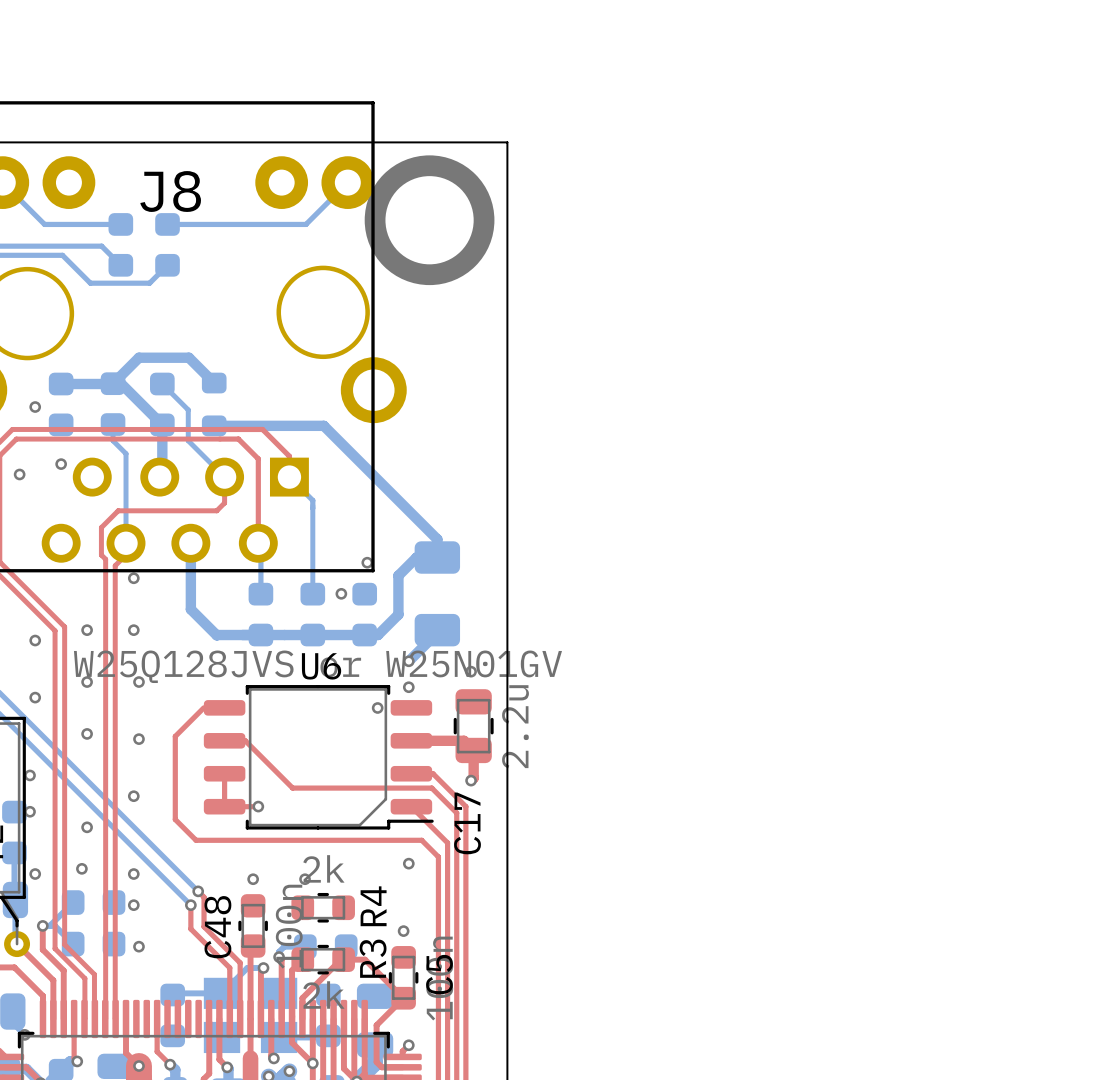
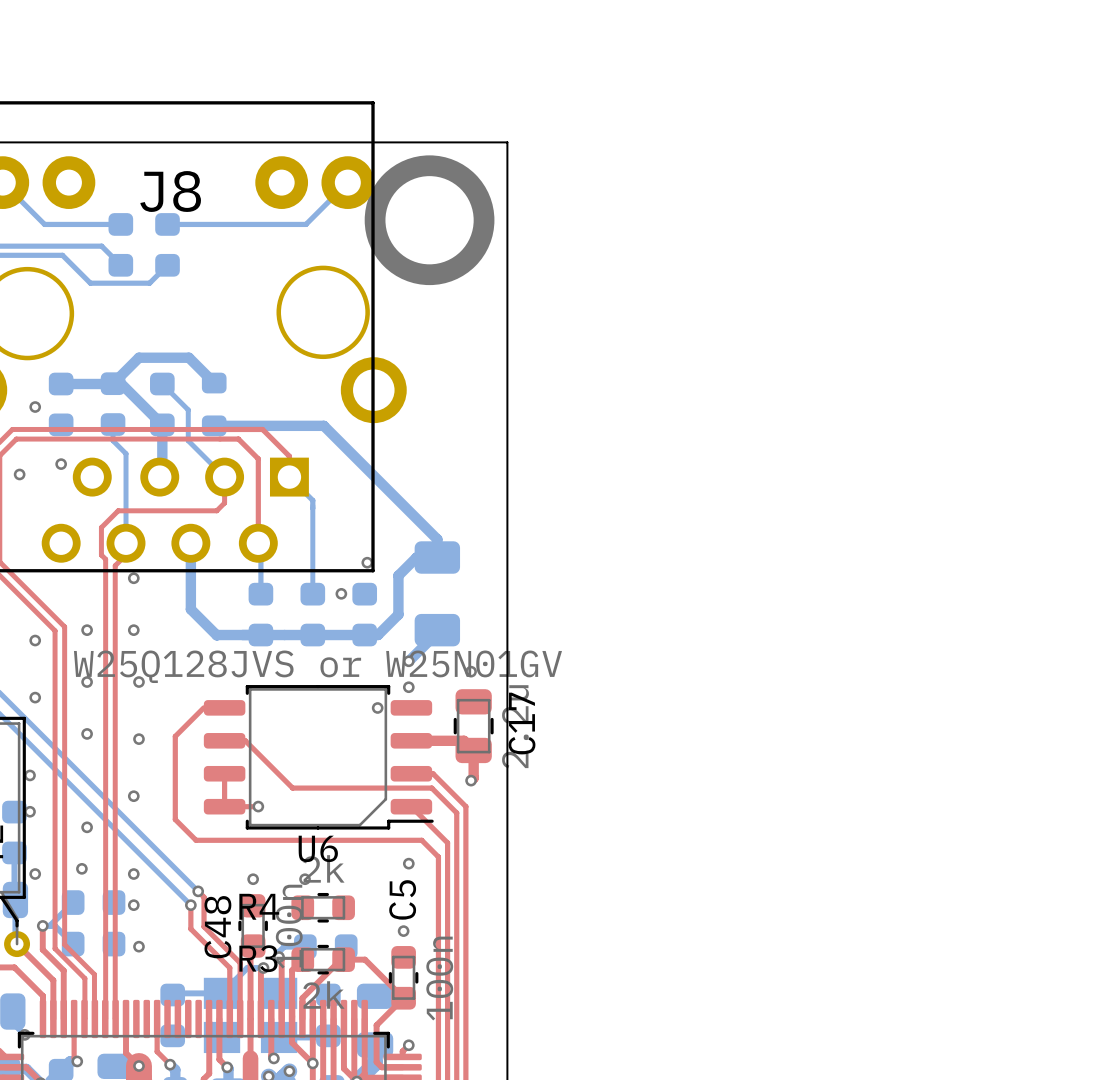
U6 name position: U6 (321, 666) -> U6 (318, 848)
C17 name position: C17 (467, 823) -> C17 (521, 723)
R4 name rotation: 0° (373, 906) -> 90° clockwise (259, 906)
R4 name position: R4 (373, 906) -> R4 (259, 906)
R3 name rotation: 0° (373, 958) -> 90° clockwise (258, 958)
R3 name position: R3 (373, 958) -> R3 (258, 958)
C5 name position: C5 (439, 974) -> C5 (402, 899)

